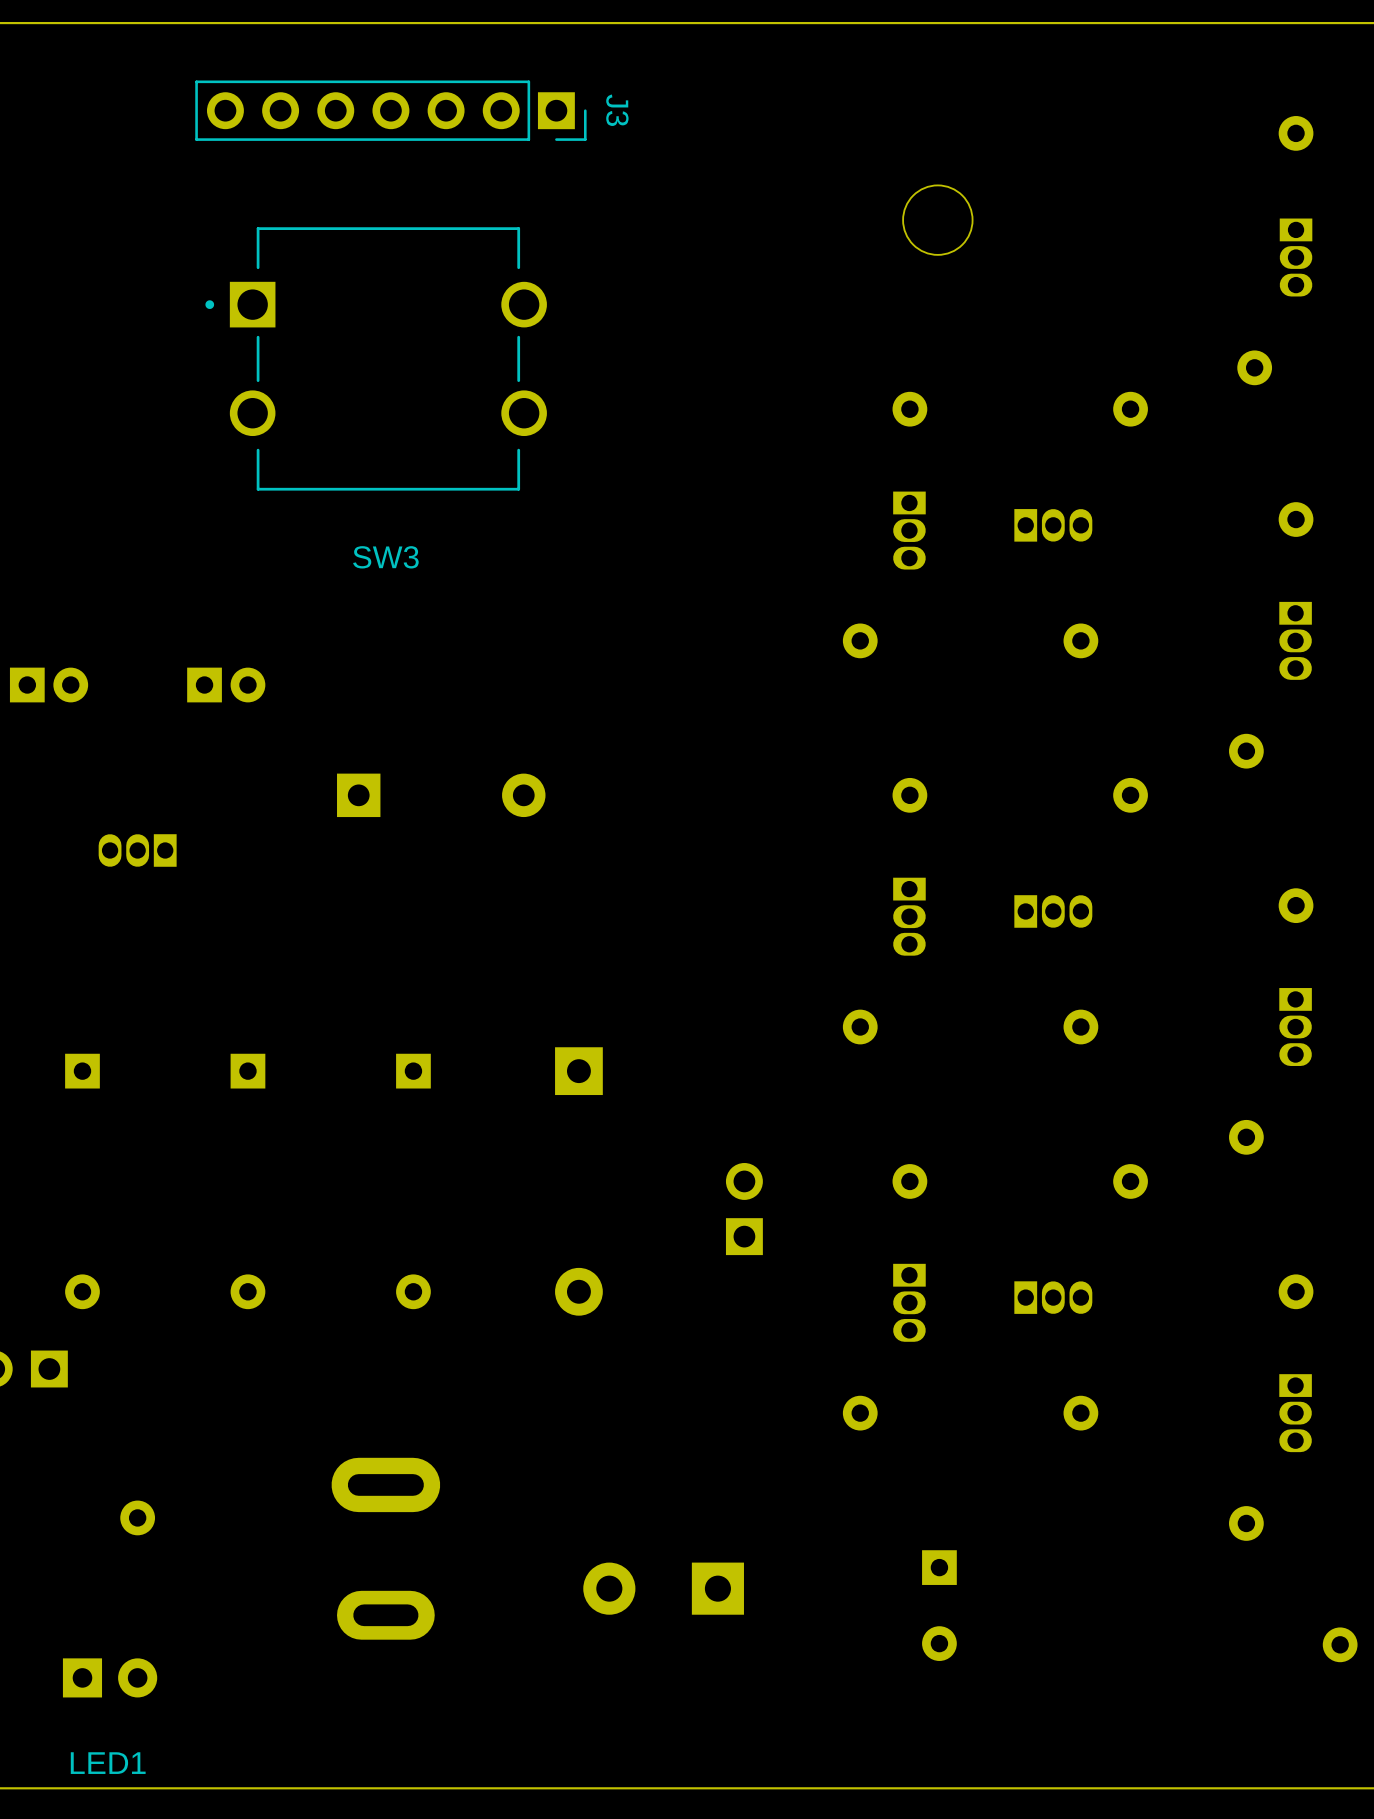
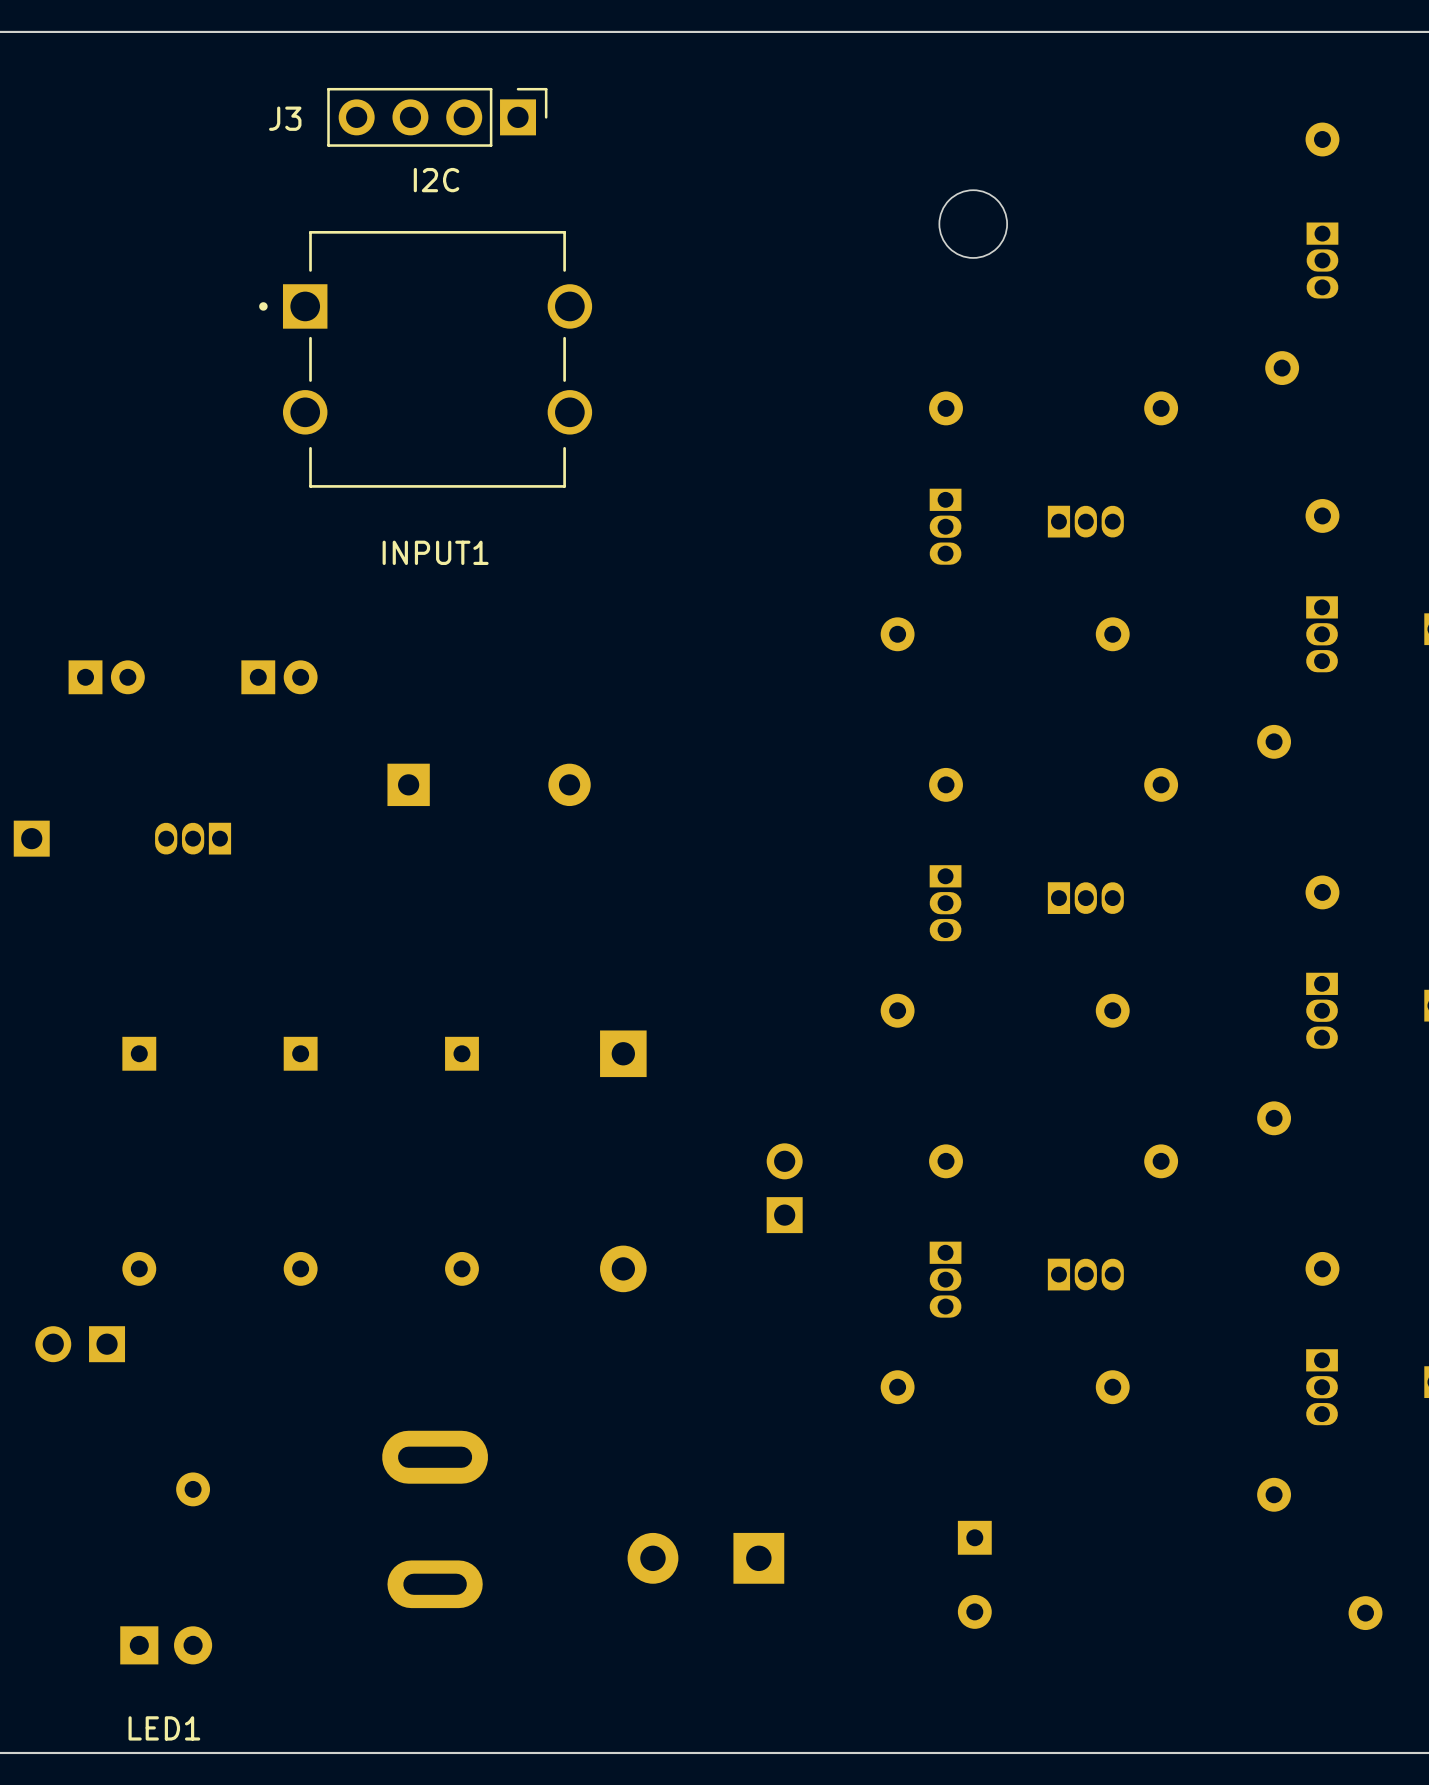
J3 footprint: [195, 80, 587, 141] -> [327, 87, 548, 147]
J3 name position: J3 (617, 110) -> J3 (285, 118)
text: none -> I2C (436, 180)
SW3 name: SW3 (385, 557) -> INPUT1 (435, 552)

